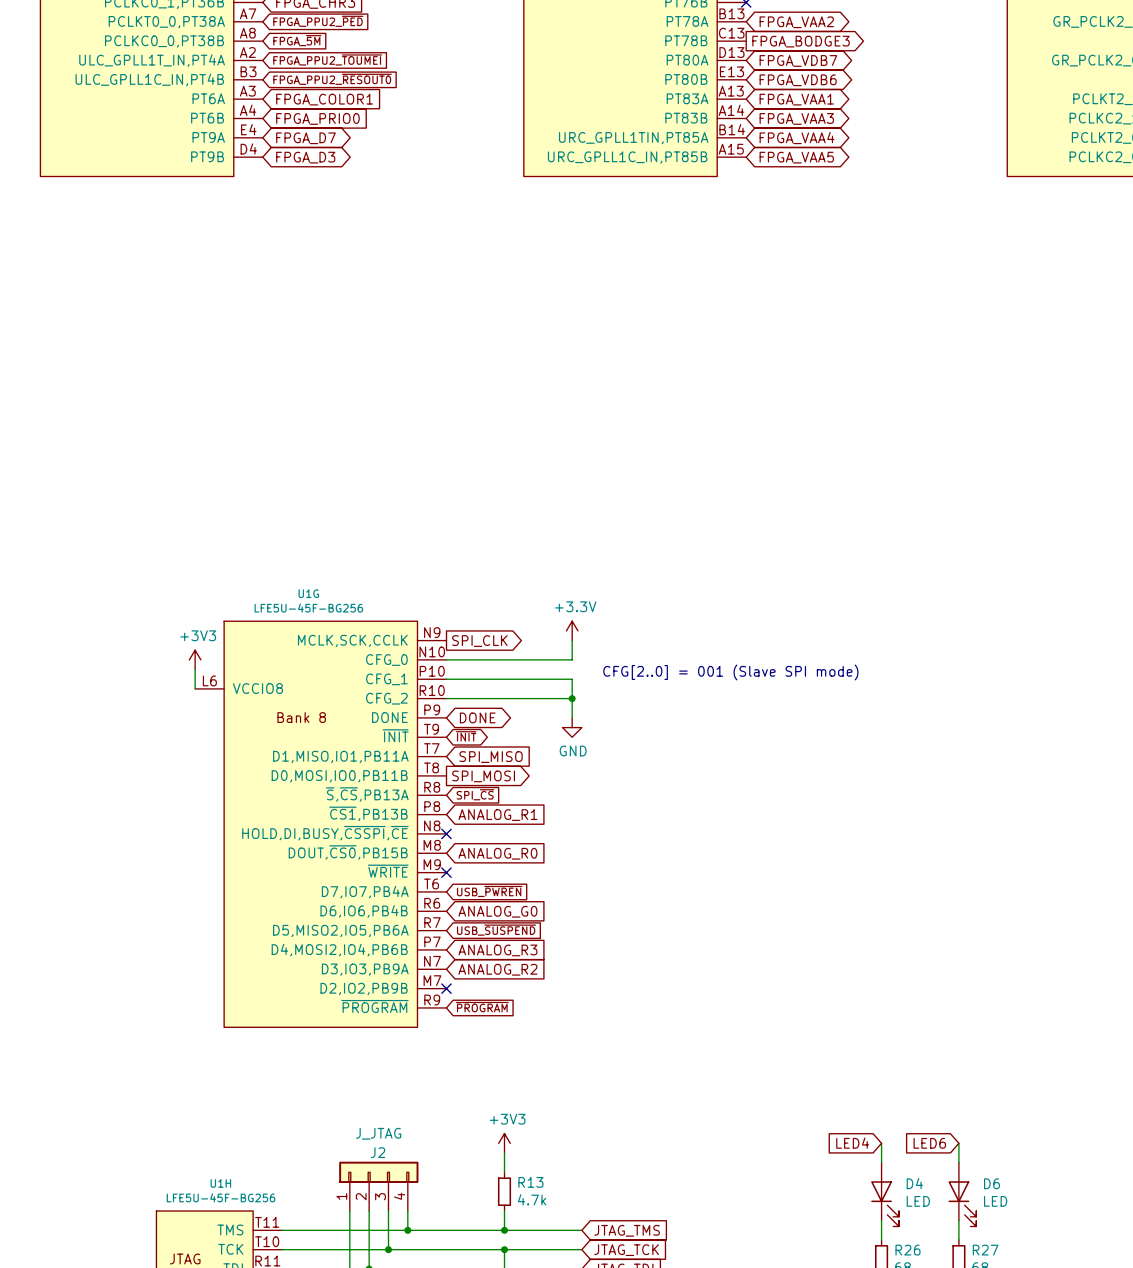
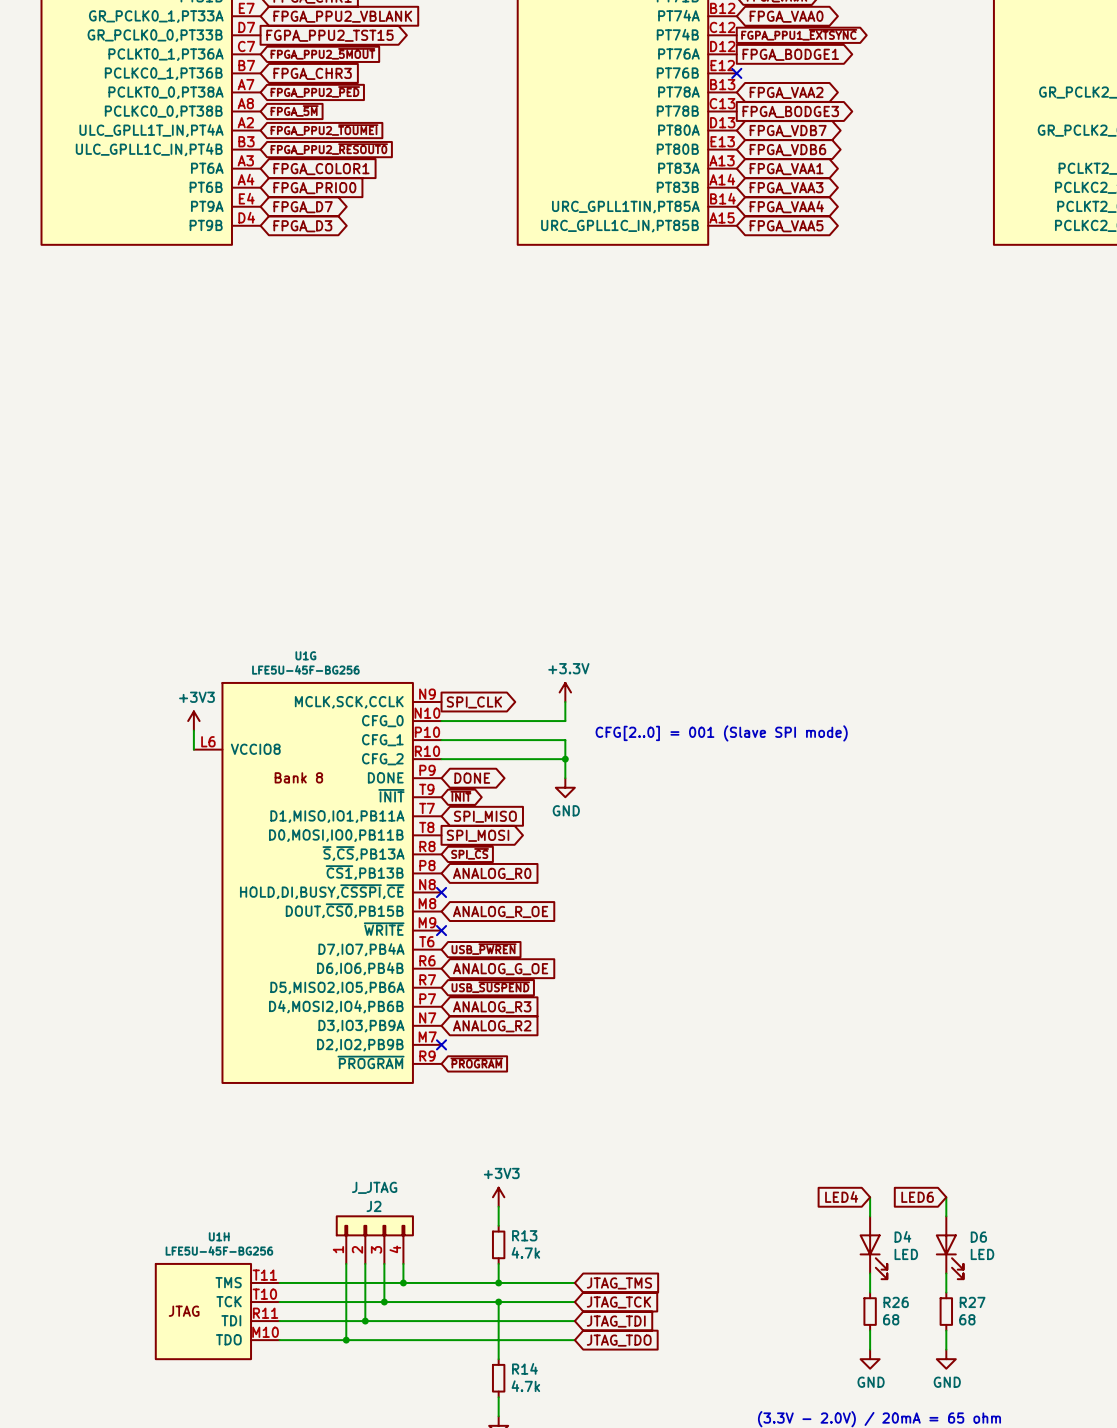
global label: ANALOG_R1 (497, 815) -> ANALOG_R0 (492, 873)
global label: ANALOG_R0 (497, 853) -> ANALOG_R_OE (500, 911)
global label: ANALOG_G0 (497, 911) -> ANALOG_G_OE (500, 969)

